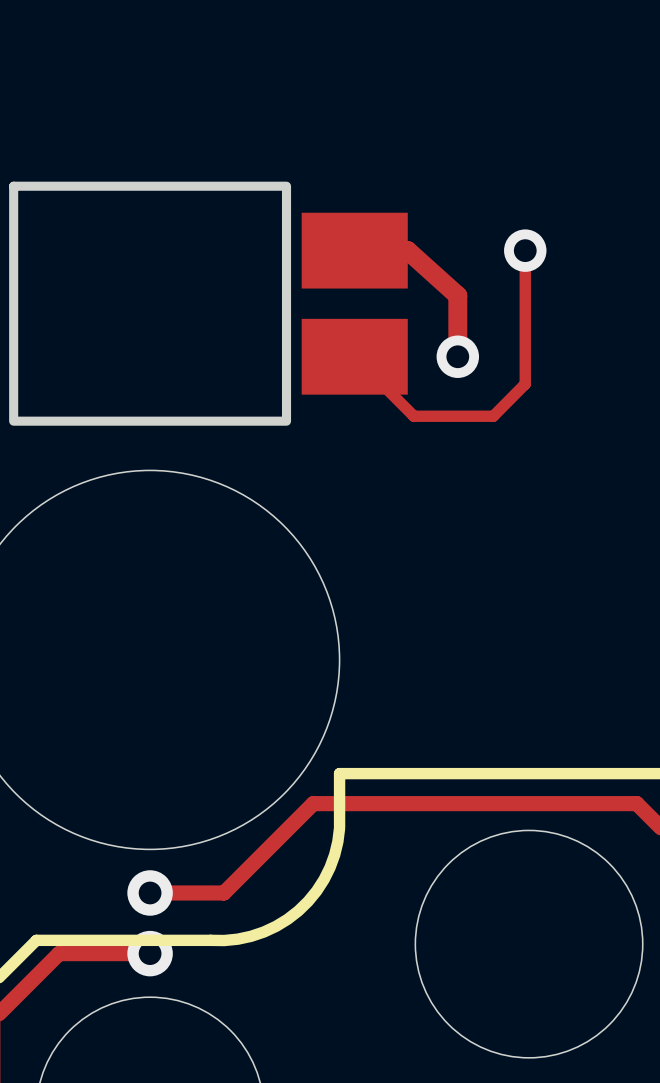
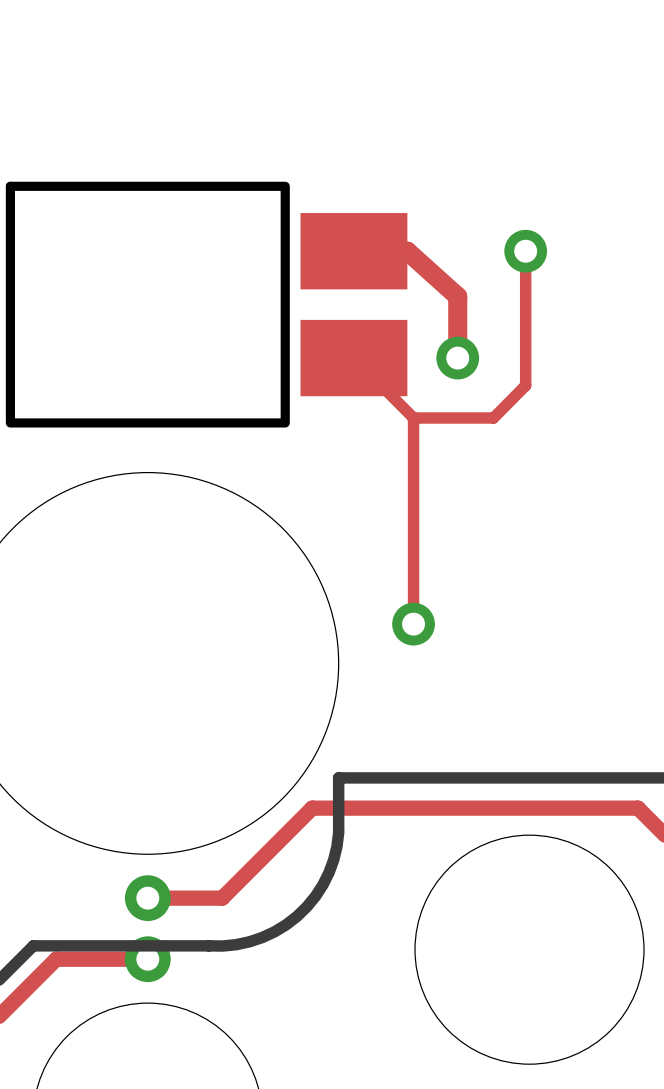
track: none -> (413, 417) (413, 624)
via: none -> (413, 624)

